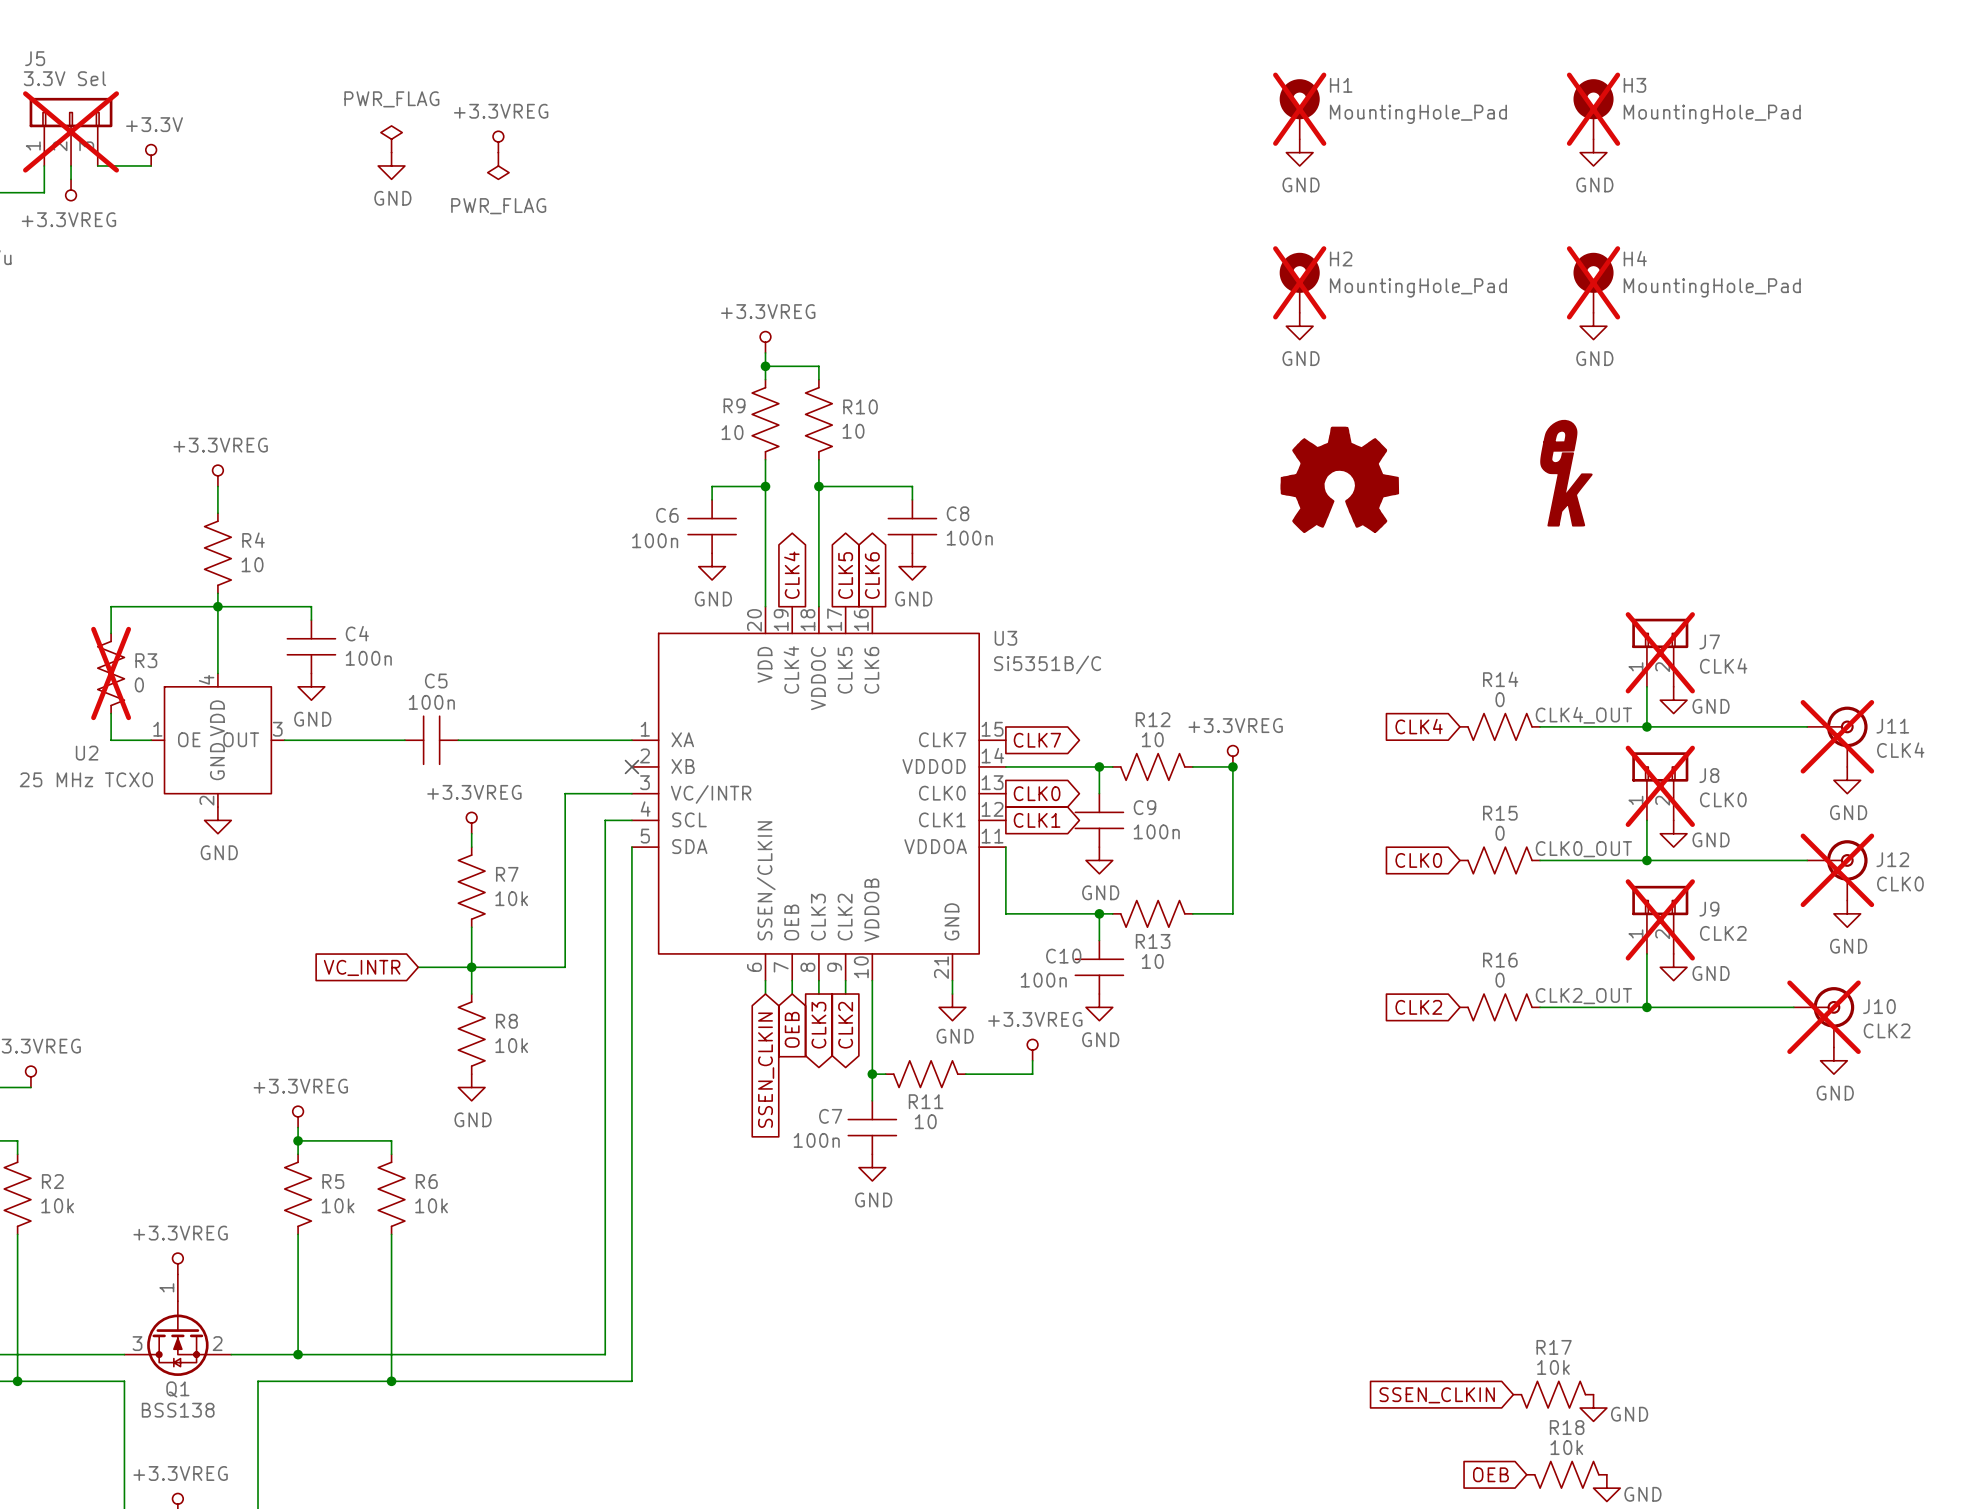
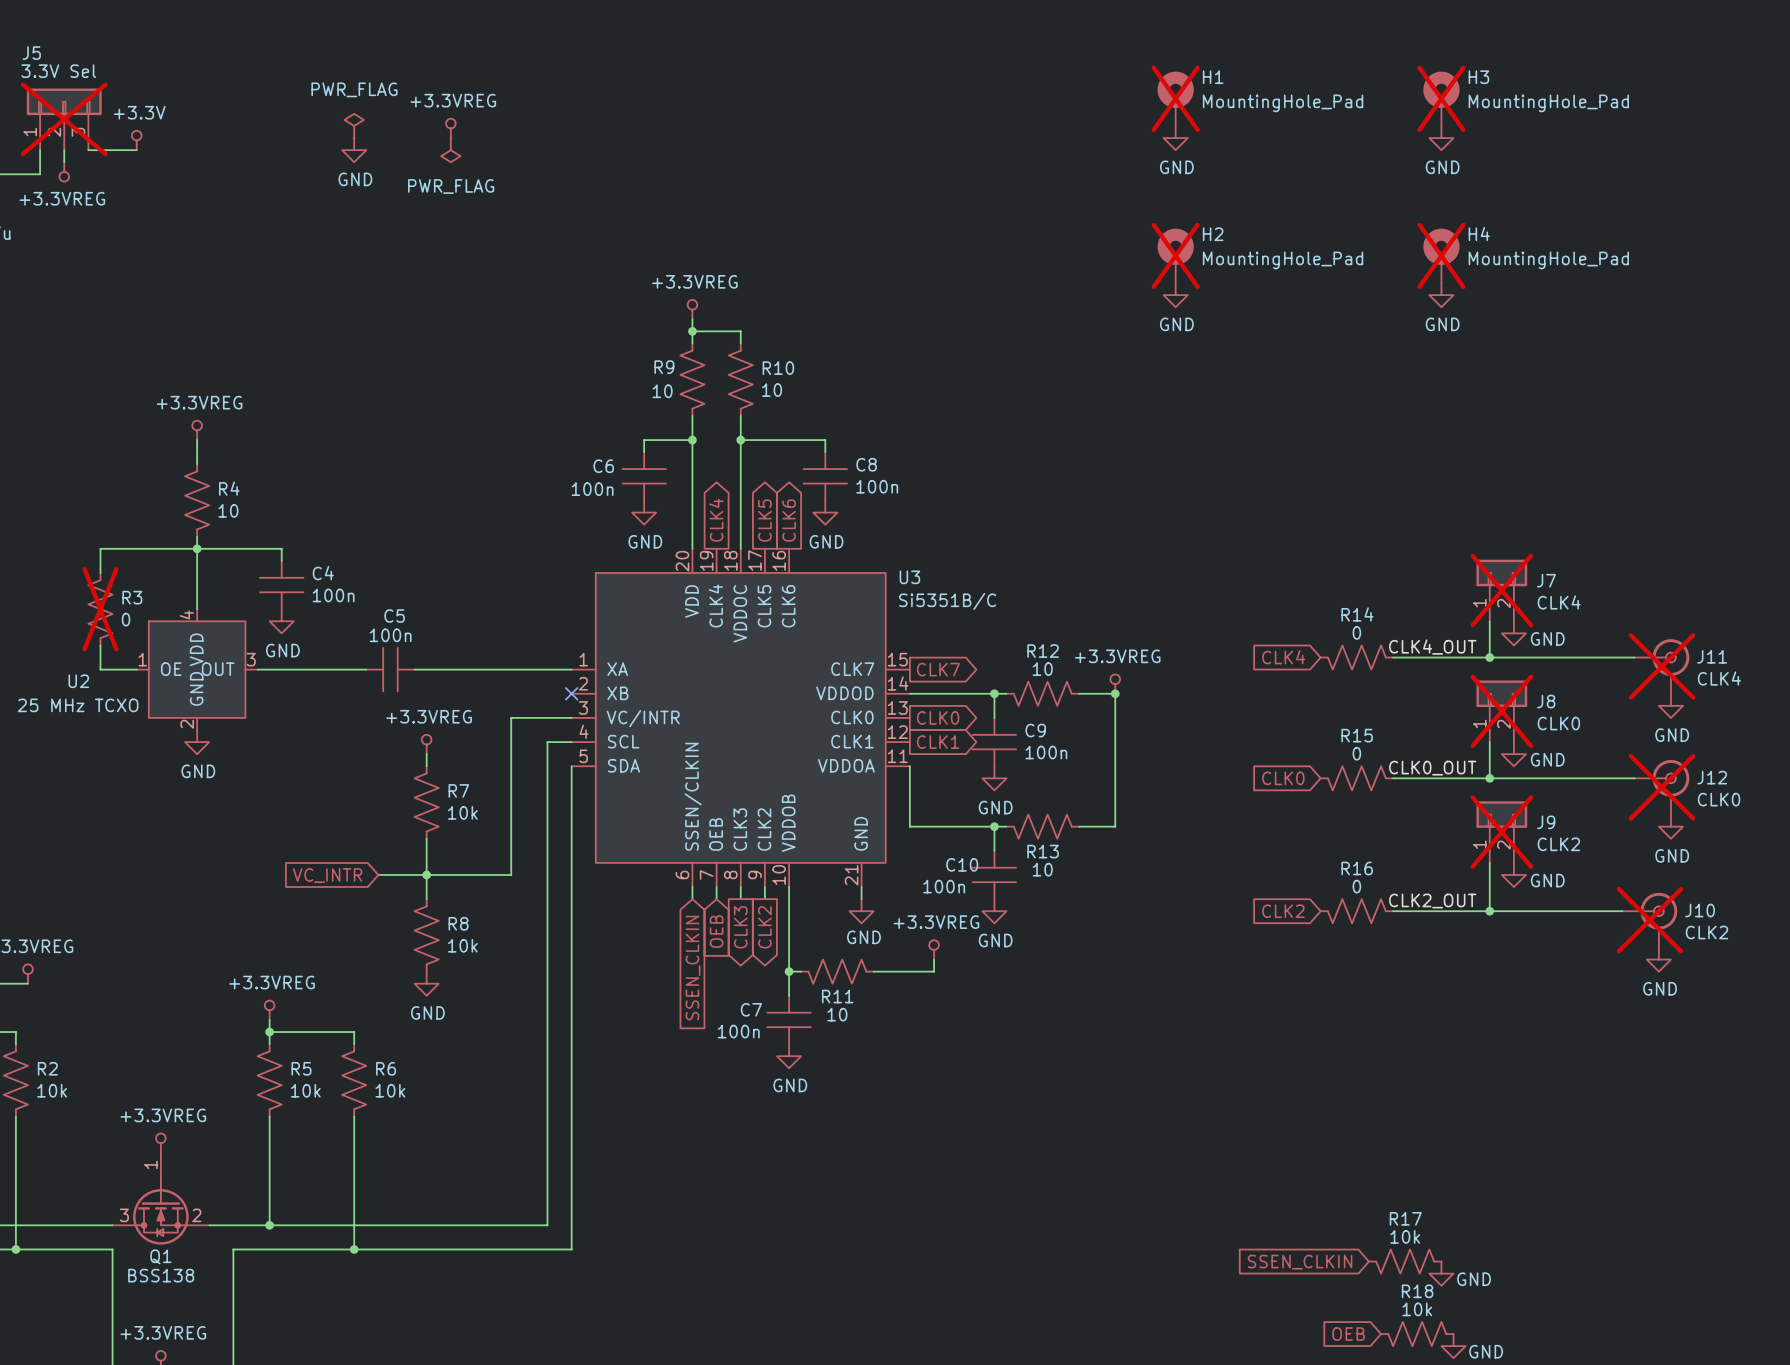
power symbol: (1566, 473) -> none
power symbol: (1339, 479) -> none

